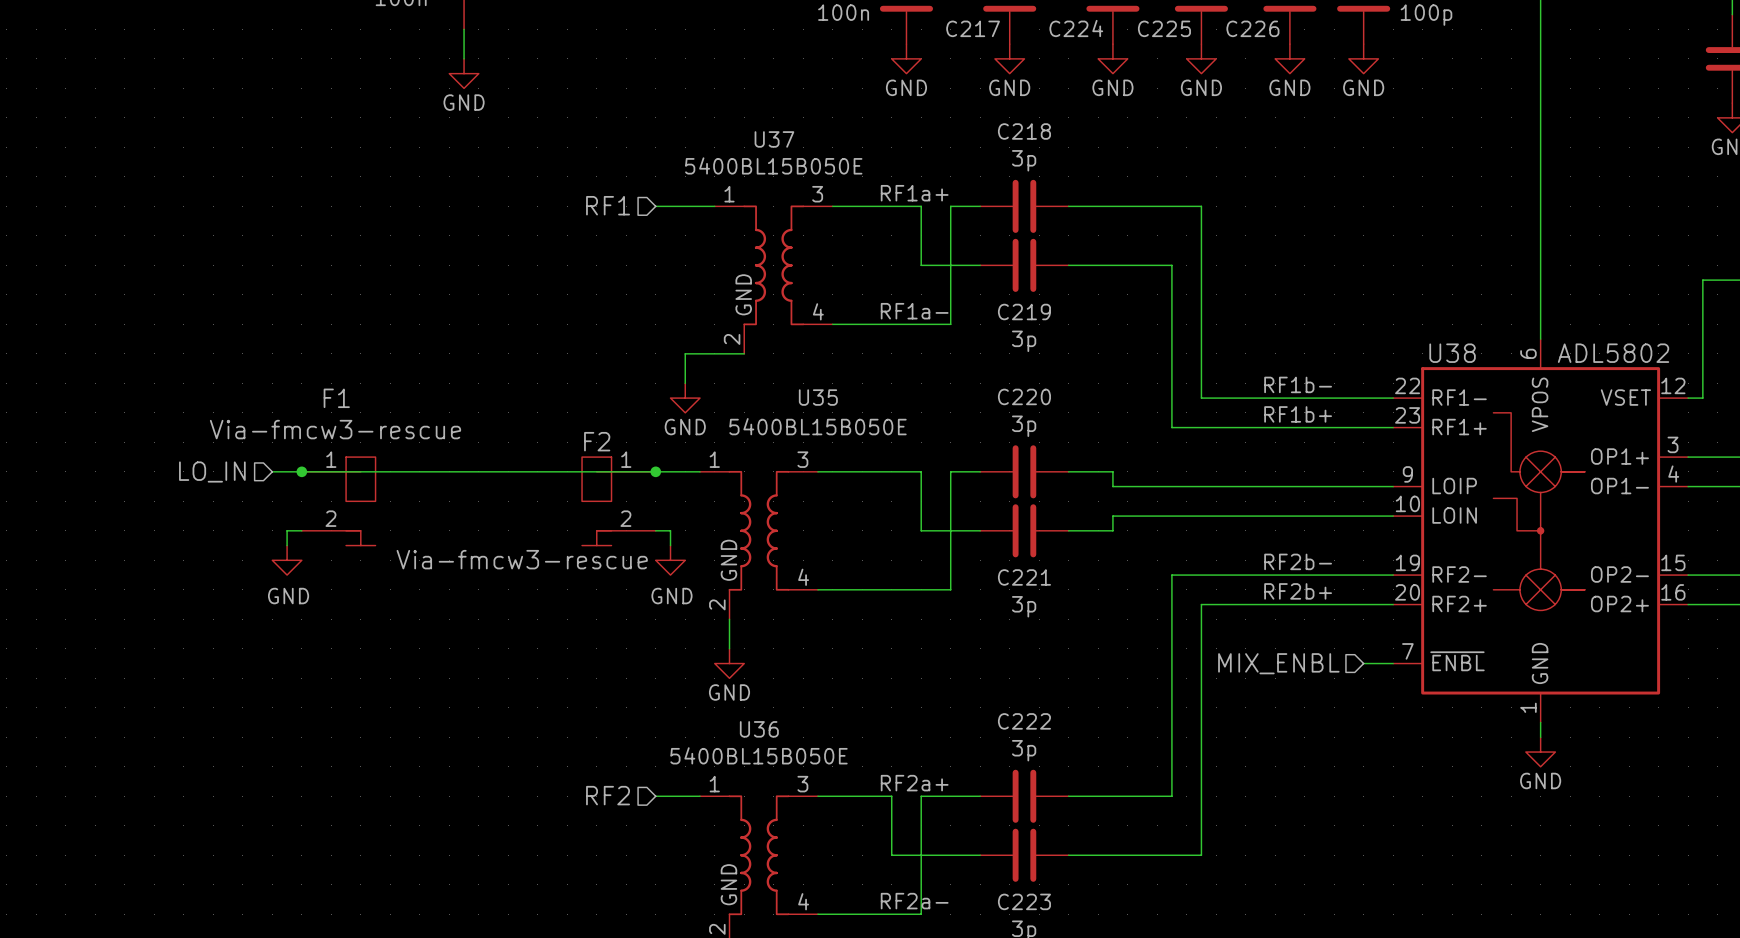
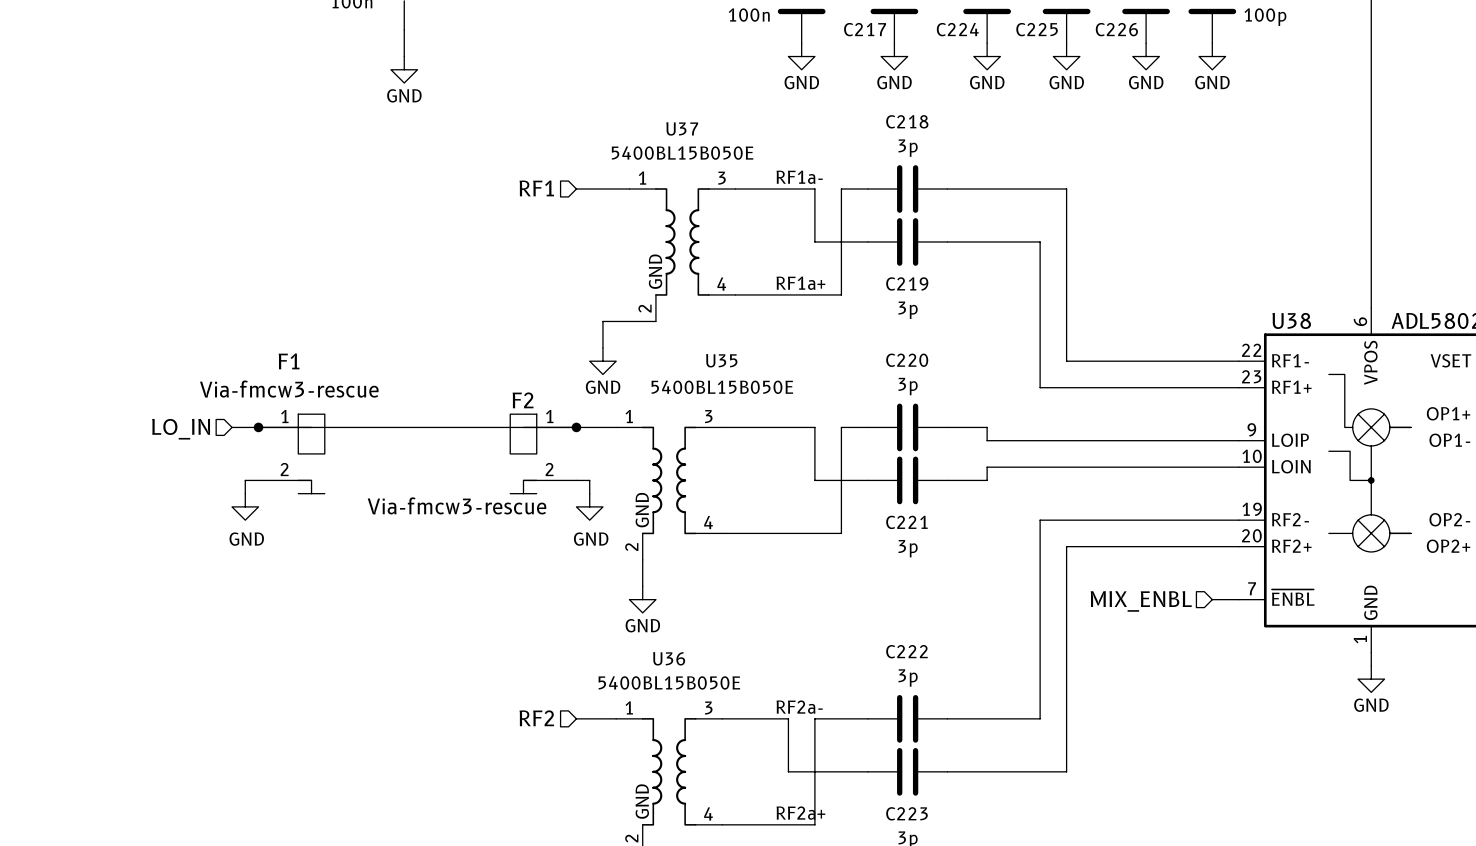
label: RF1a+ (914, 193) -> RF1a- (799, 177)
label: RF1a- (914, 311) -> RF1a+ (800, 283)
label: RF1b- (1298, 384) -> none
label: RF1b+ (1298, 414) -> none
label: RF2b- (1298, 561) -> none
label: RF2b+ (1298, 591) -> none
label: RF2a+ (914, 783) -> RF2a- (799, 707)
label: RF2a- (914, 901) -> RF2a+ (800, 813)

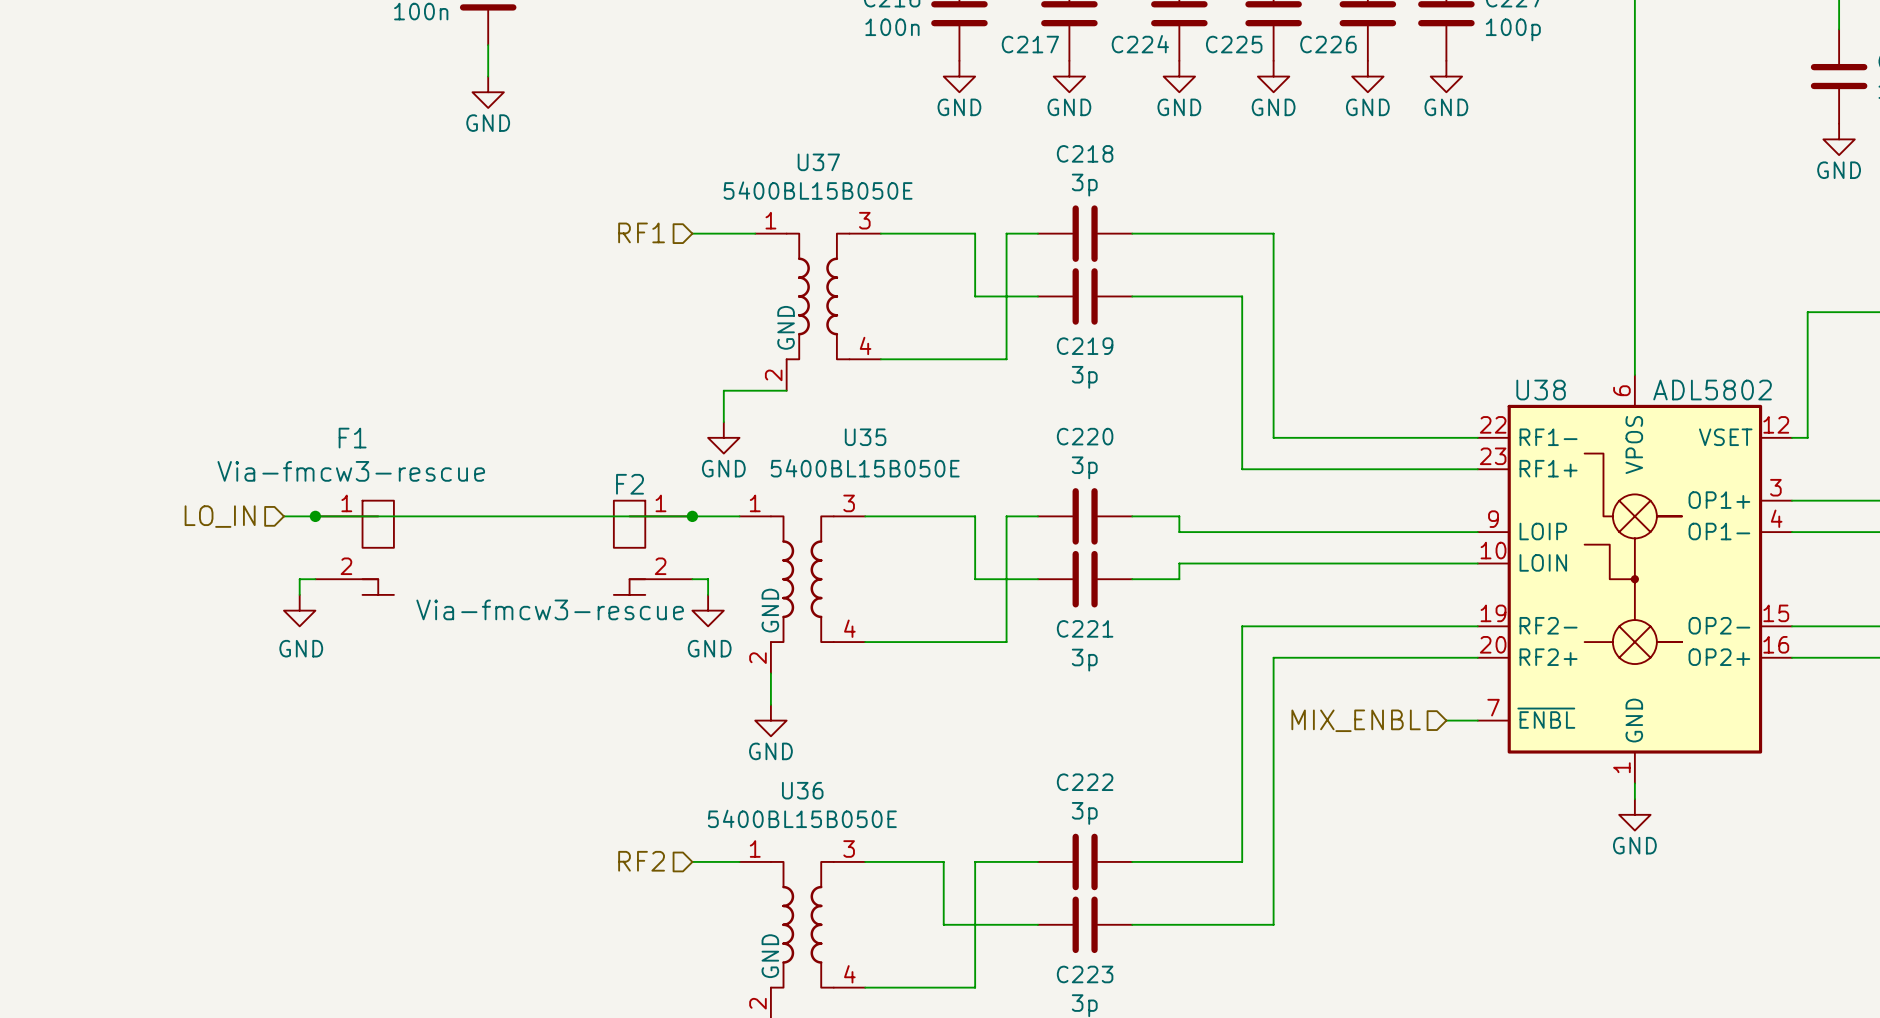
label: RF1a- (799, 177) -> none
label: RF1a+ (800, 283) -> none
label: RF2a- (799, 707) -> none
label: RF2a+ (800, 813) -> none

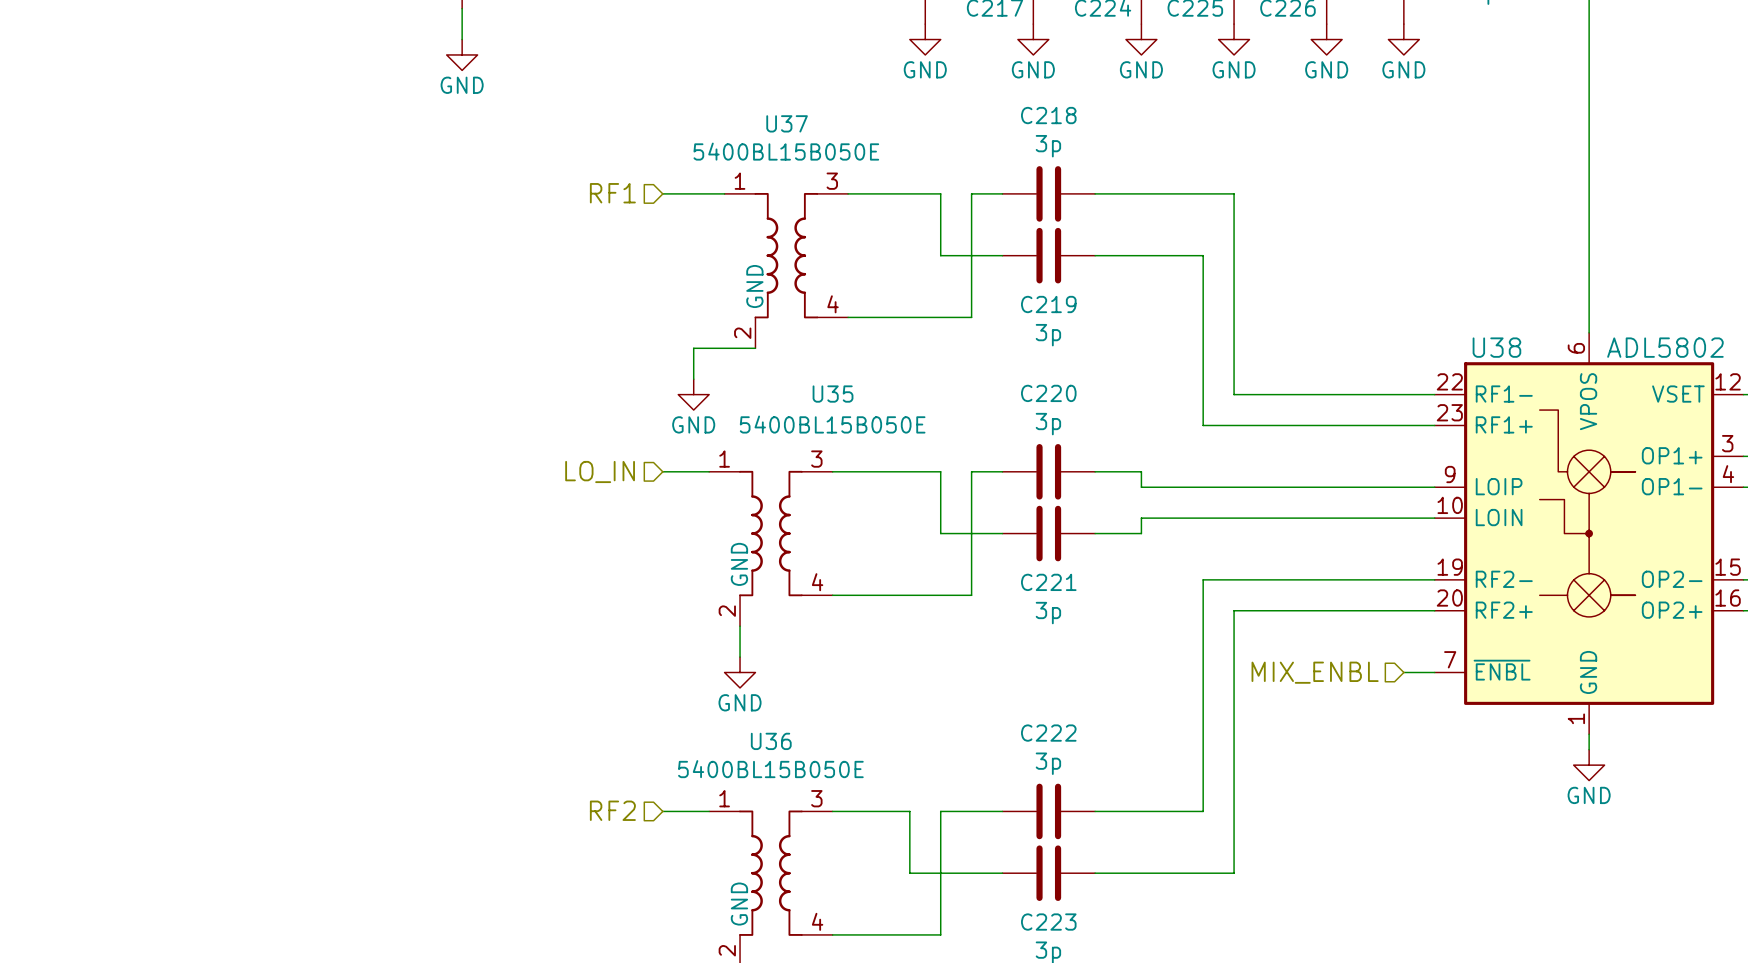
hierarchical label: LO_IN (220, 516) -> none
wire: (283, 516) (692, 516) -> none
junction: (315, 516) -> none
hierarchical label: none -> LO_IN (600, 471)
junction: (692, 516) -> none
F1: Via-fmcw3-rescue (354, 547) -> none
F2: Via-fmcw3-rescue (653, 547) -> none
wire: (315, 579) (299, 579) (299, 594) -> none
wire: (692, 579) (708, 579) (708, 594) -> none
power symbol: GND (299, 610) -> none
power symbol: GND (708, 610) -> none

